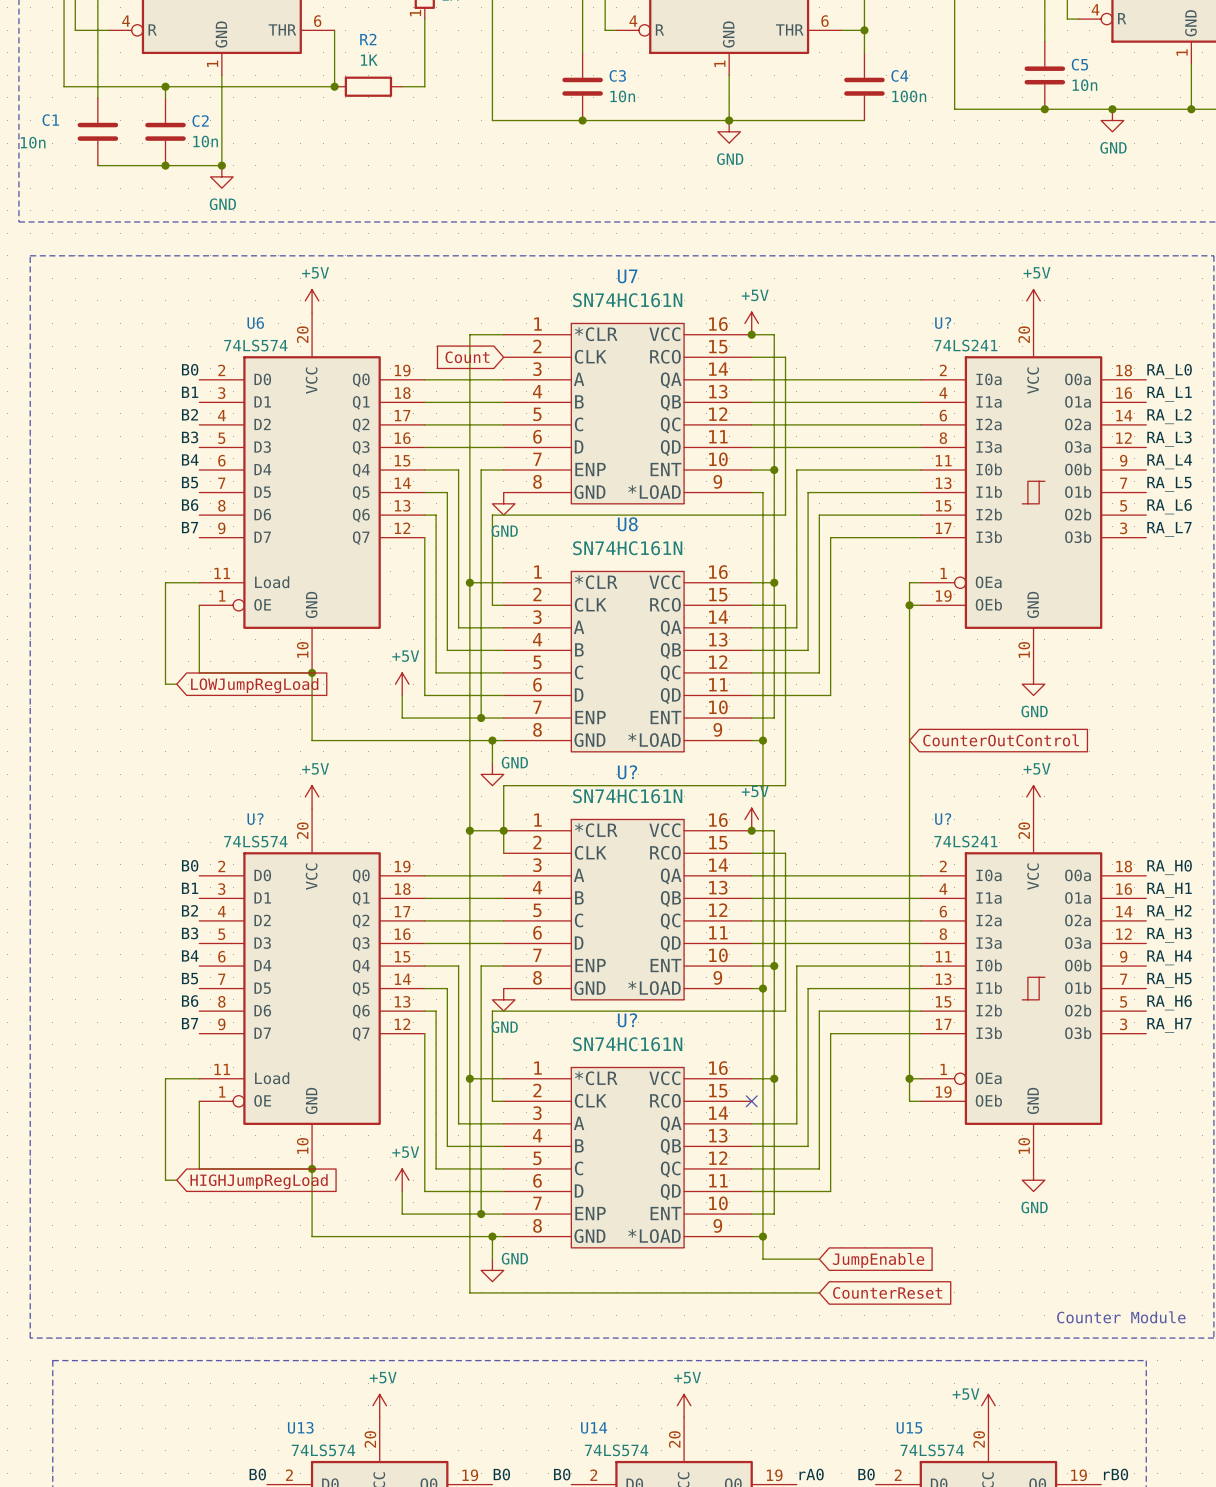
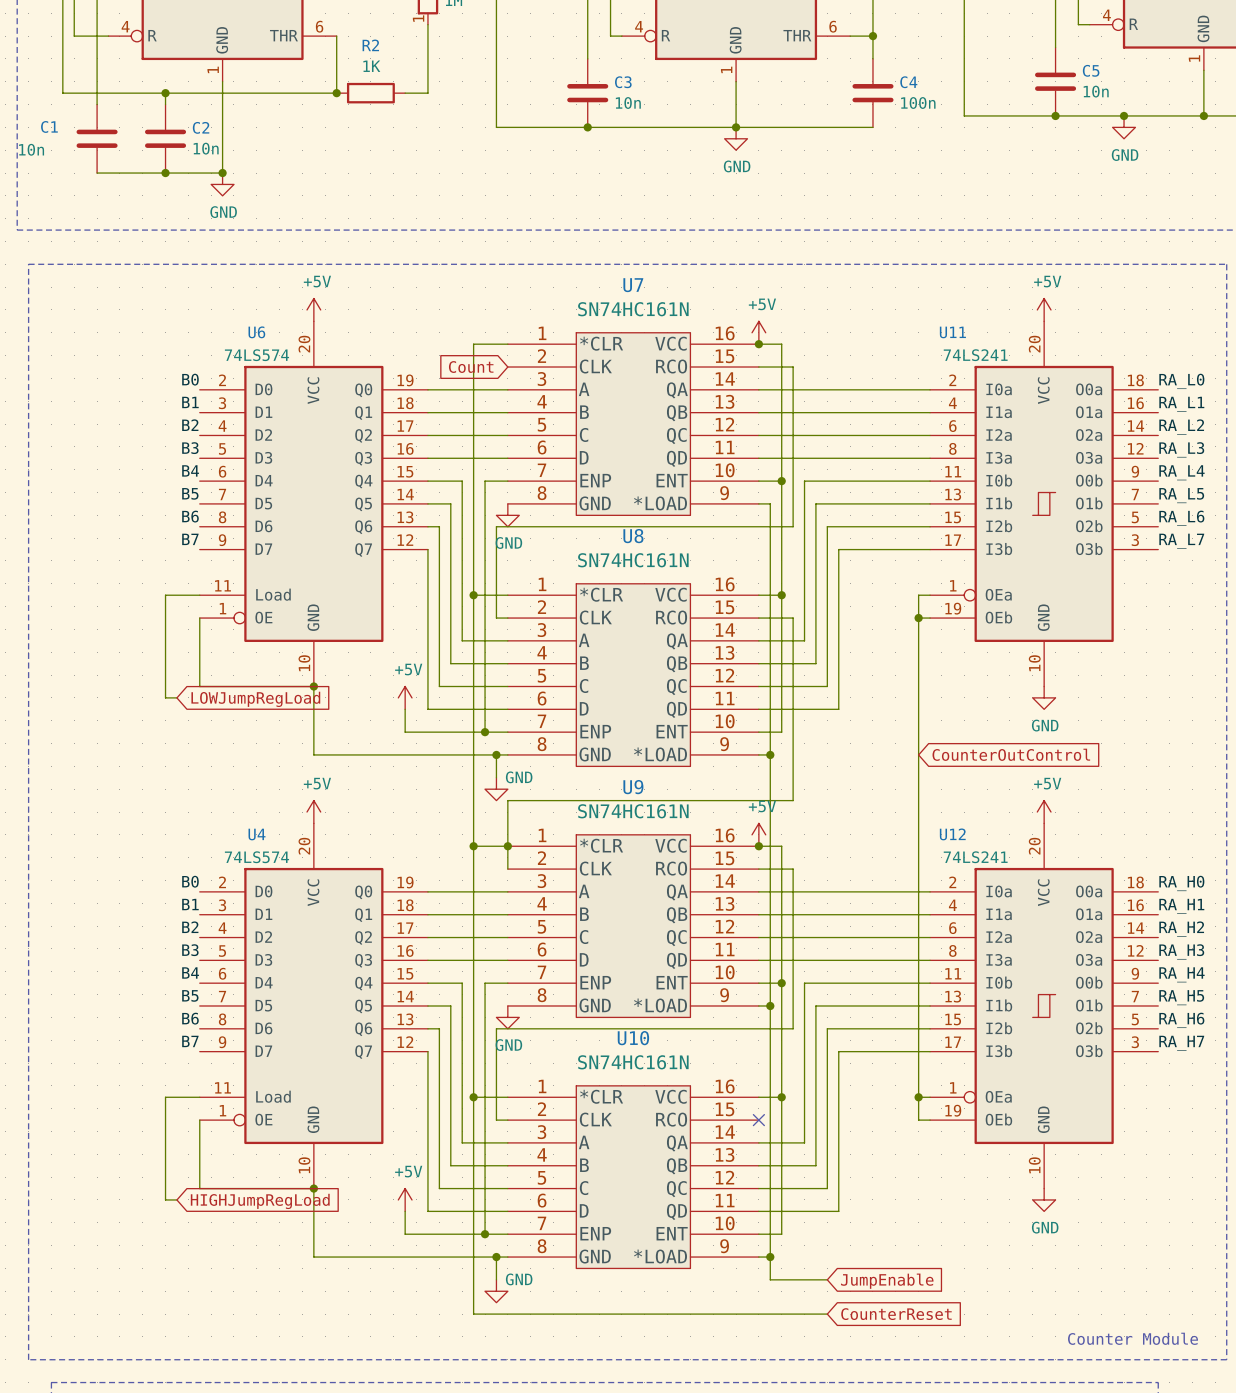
U? name: U? (943, 323) -> U11 (952, 332)
U? name: U? (627, 772) -> U9 (633, 787)
U? name: U? (255, 819) -> U4 (257, 834)
U? name: U? (943, 819) -> U12 (952, 834)
U? name: U? (627, 1020) -> U10 (633, 1038)

